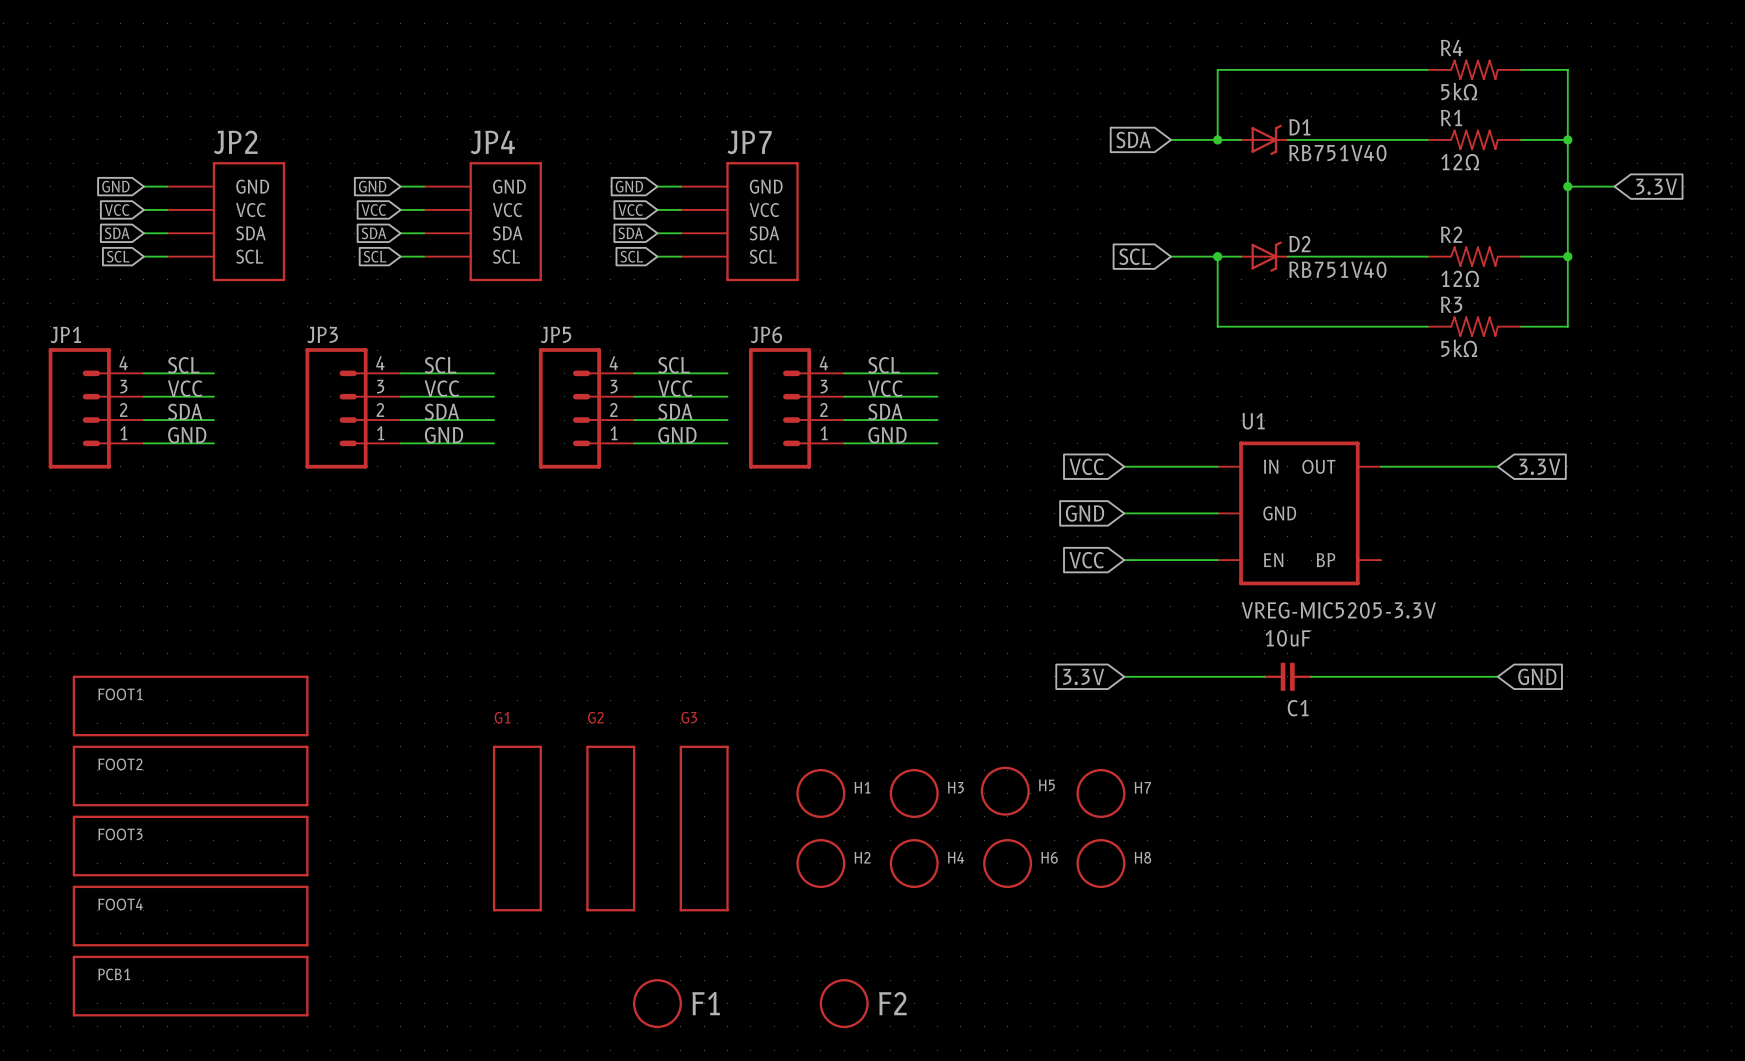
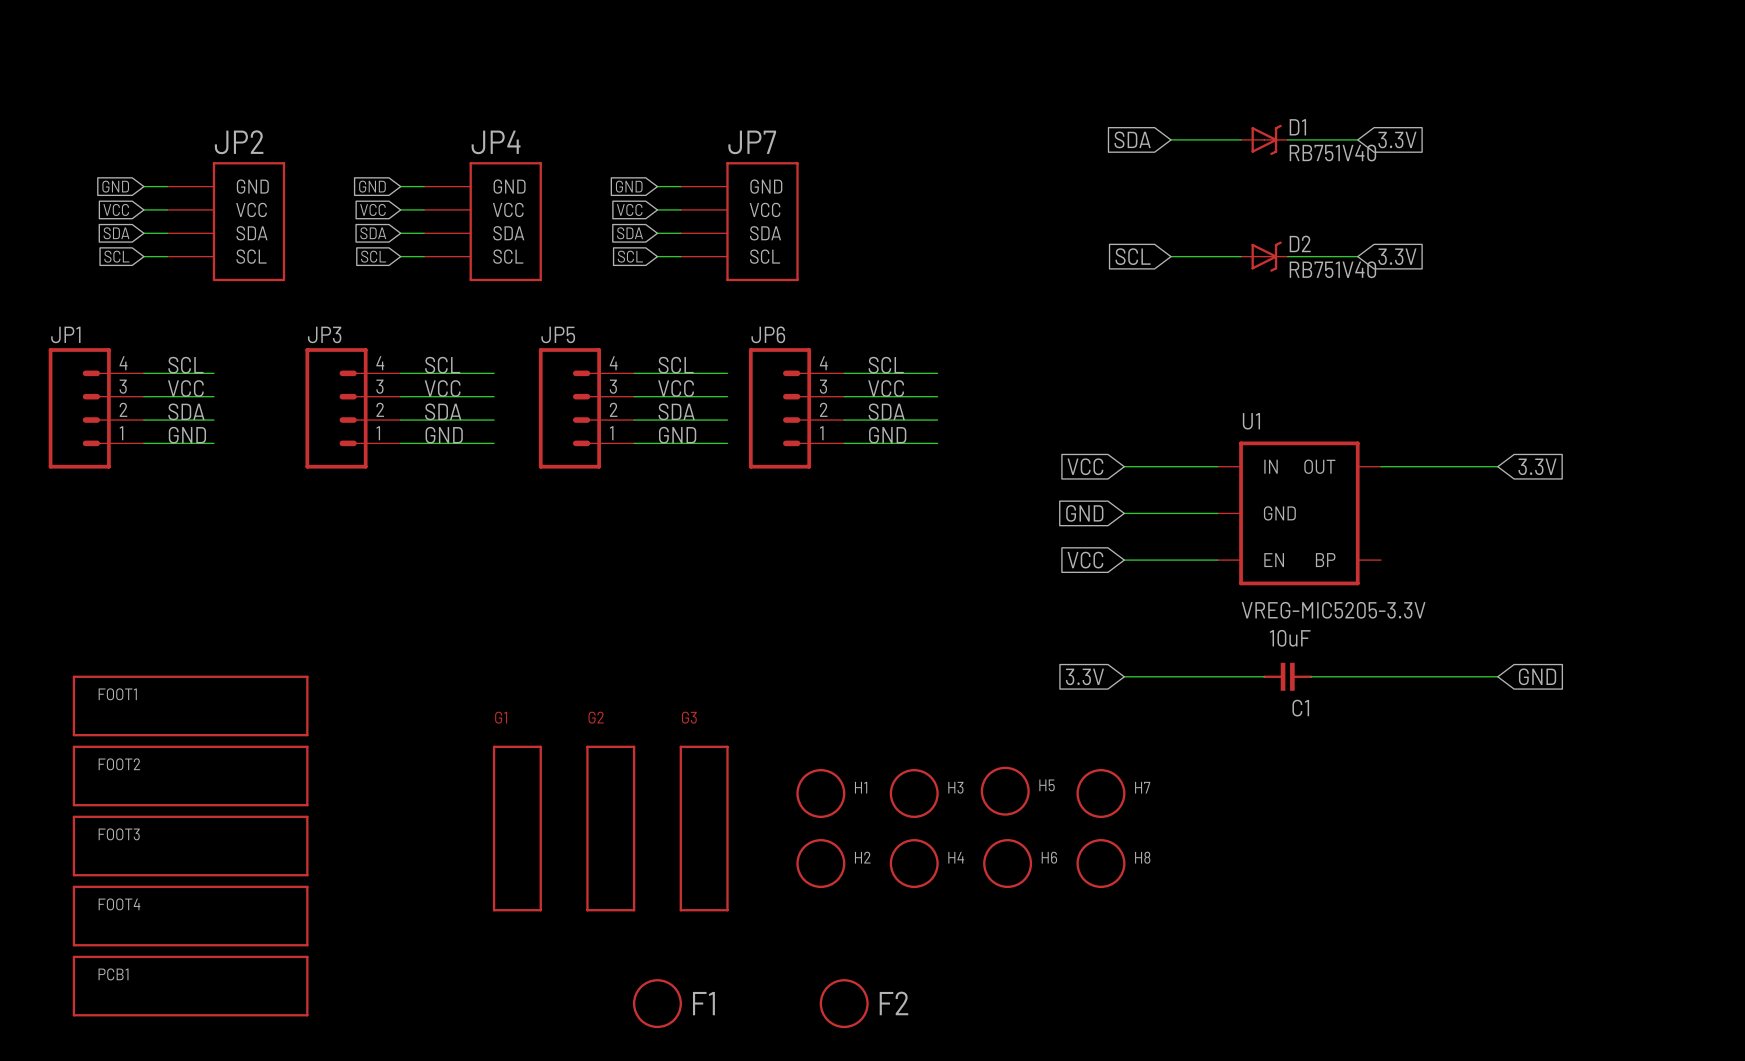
wire: (1427, 69) (1217, 69) (1217, 139) -> none
R4: 5kΩ (1474, 69) -> none
wire: (1521, 69) (1567, 69) (1567, 326) (1521, 326) -> none
junction: (1217, 139) -> none
wire: (1357, 139) (1427, 139) -> none
R1: 12Ω (1474, 139) -> none
wire: (1521, 139) (1567, 139) -> none
junction: (1567, 139) -> none
global label: none -> 3.3V (1397, 140)
wire: (1567, 186) (1614, 186) -> none
junction: (1567, 186) -> none
global label: 3.3V (1656, 186) -> none
wire: (1217, 256) (1217, 326) (1427, 326) -> none
junction: (1217, 256) -> none
wire: (1357, 256) (1427, 256) -> none
global label: none -> 3.3V (1397, 256)
R2: 12Ω (1474, 256) -> none
wire: (1521, 256) (1567, 256) -> none
junction: (1567, 256) -> none
R3: 5kΩ (1474, 326) -> none

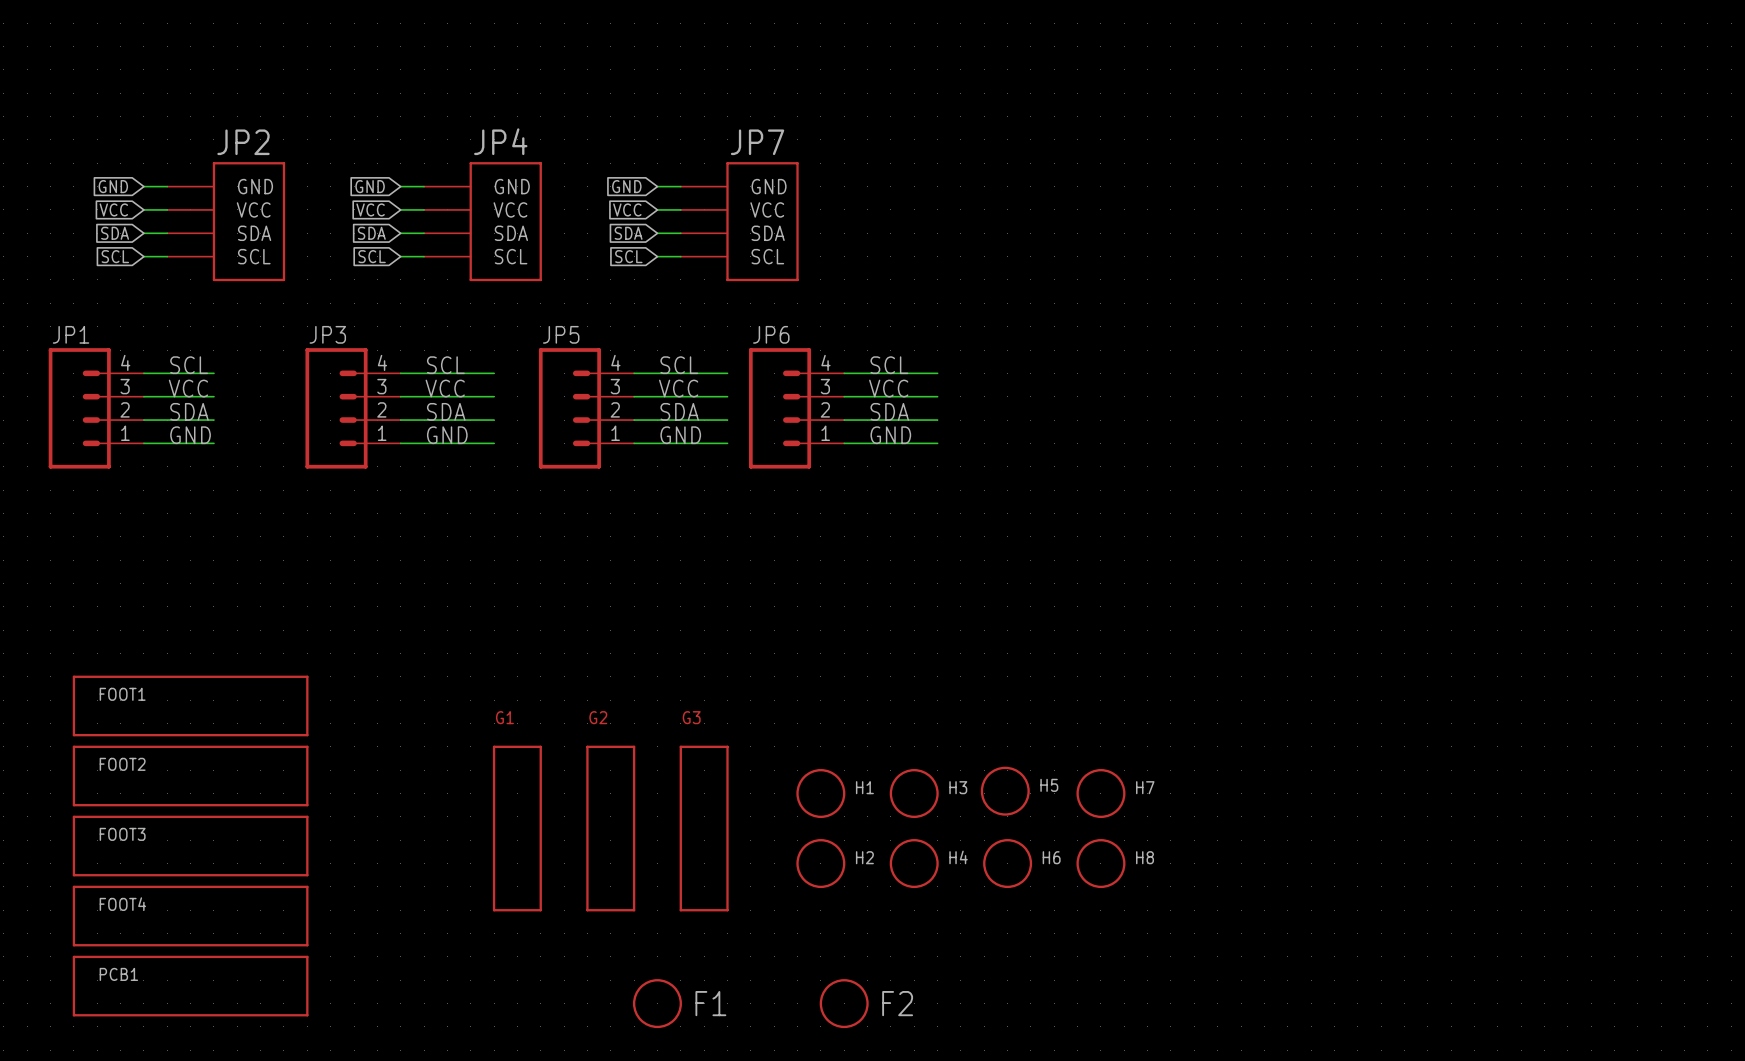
global label: SDA (1132, 139) -> none
wire: (1170, 139) (1241, 139) -> none
D1: RB751V40 (1264, 139) -> none
wire: (1287, 139) (1357, 139) -> none
global label: 3.3V (1397, 140) -> none
global label: SCL (1133, 256) -> none
wire: (1170, 256) (1241, 256) -> none
D2: RB751V40 (1264, 256) -> none
wire: (1287, 256) (1357, 256) -> none
global label: 3.3V (1397, 256) -> none
global label: VCC (1085, 466) -> none
wire: (1124, 466) (1217, 466) -> none
wire: (1381, 466) (1497, 466) -> none
global label: 3.3V (1537, 466) -> none
global label: GND (1084, 513) -> none
wire: (1124, 513) (1217, 513) -> none
U1: VREG-MIC5205-3.3V (1299, 513) -> none
global label: VCC (1085, 560) -> none
wire: (1124, 560) (1217, 560) -> none
global label: 3.3V (1084, 676) -> none
wire: (1124, 676) (1264, 676) -> none
C1: 10uF (1287, 676) -> none
wire: (1311, 676) (1497, 676) -> none
global label: GND (1537, 676) -> none

